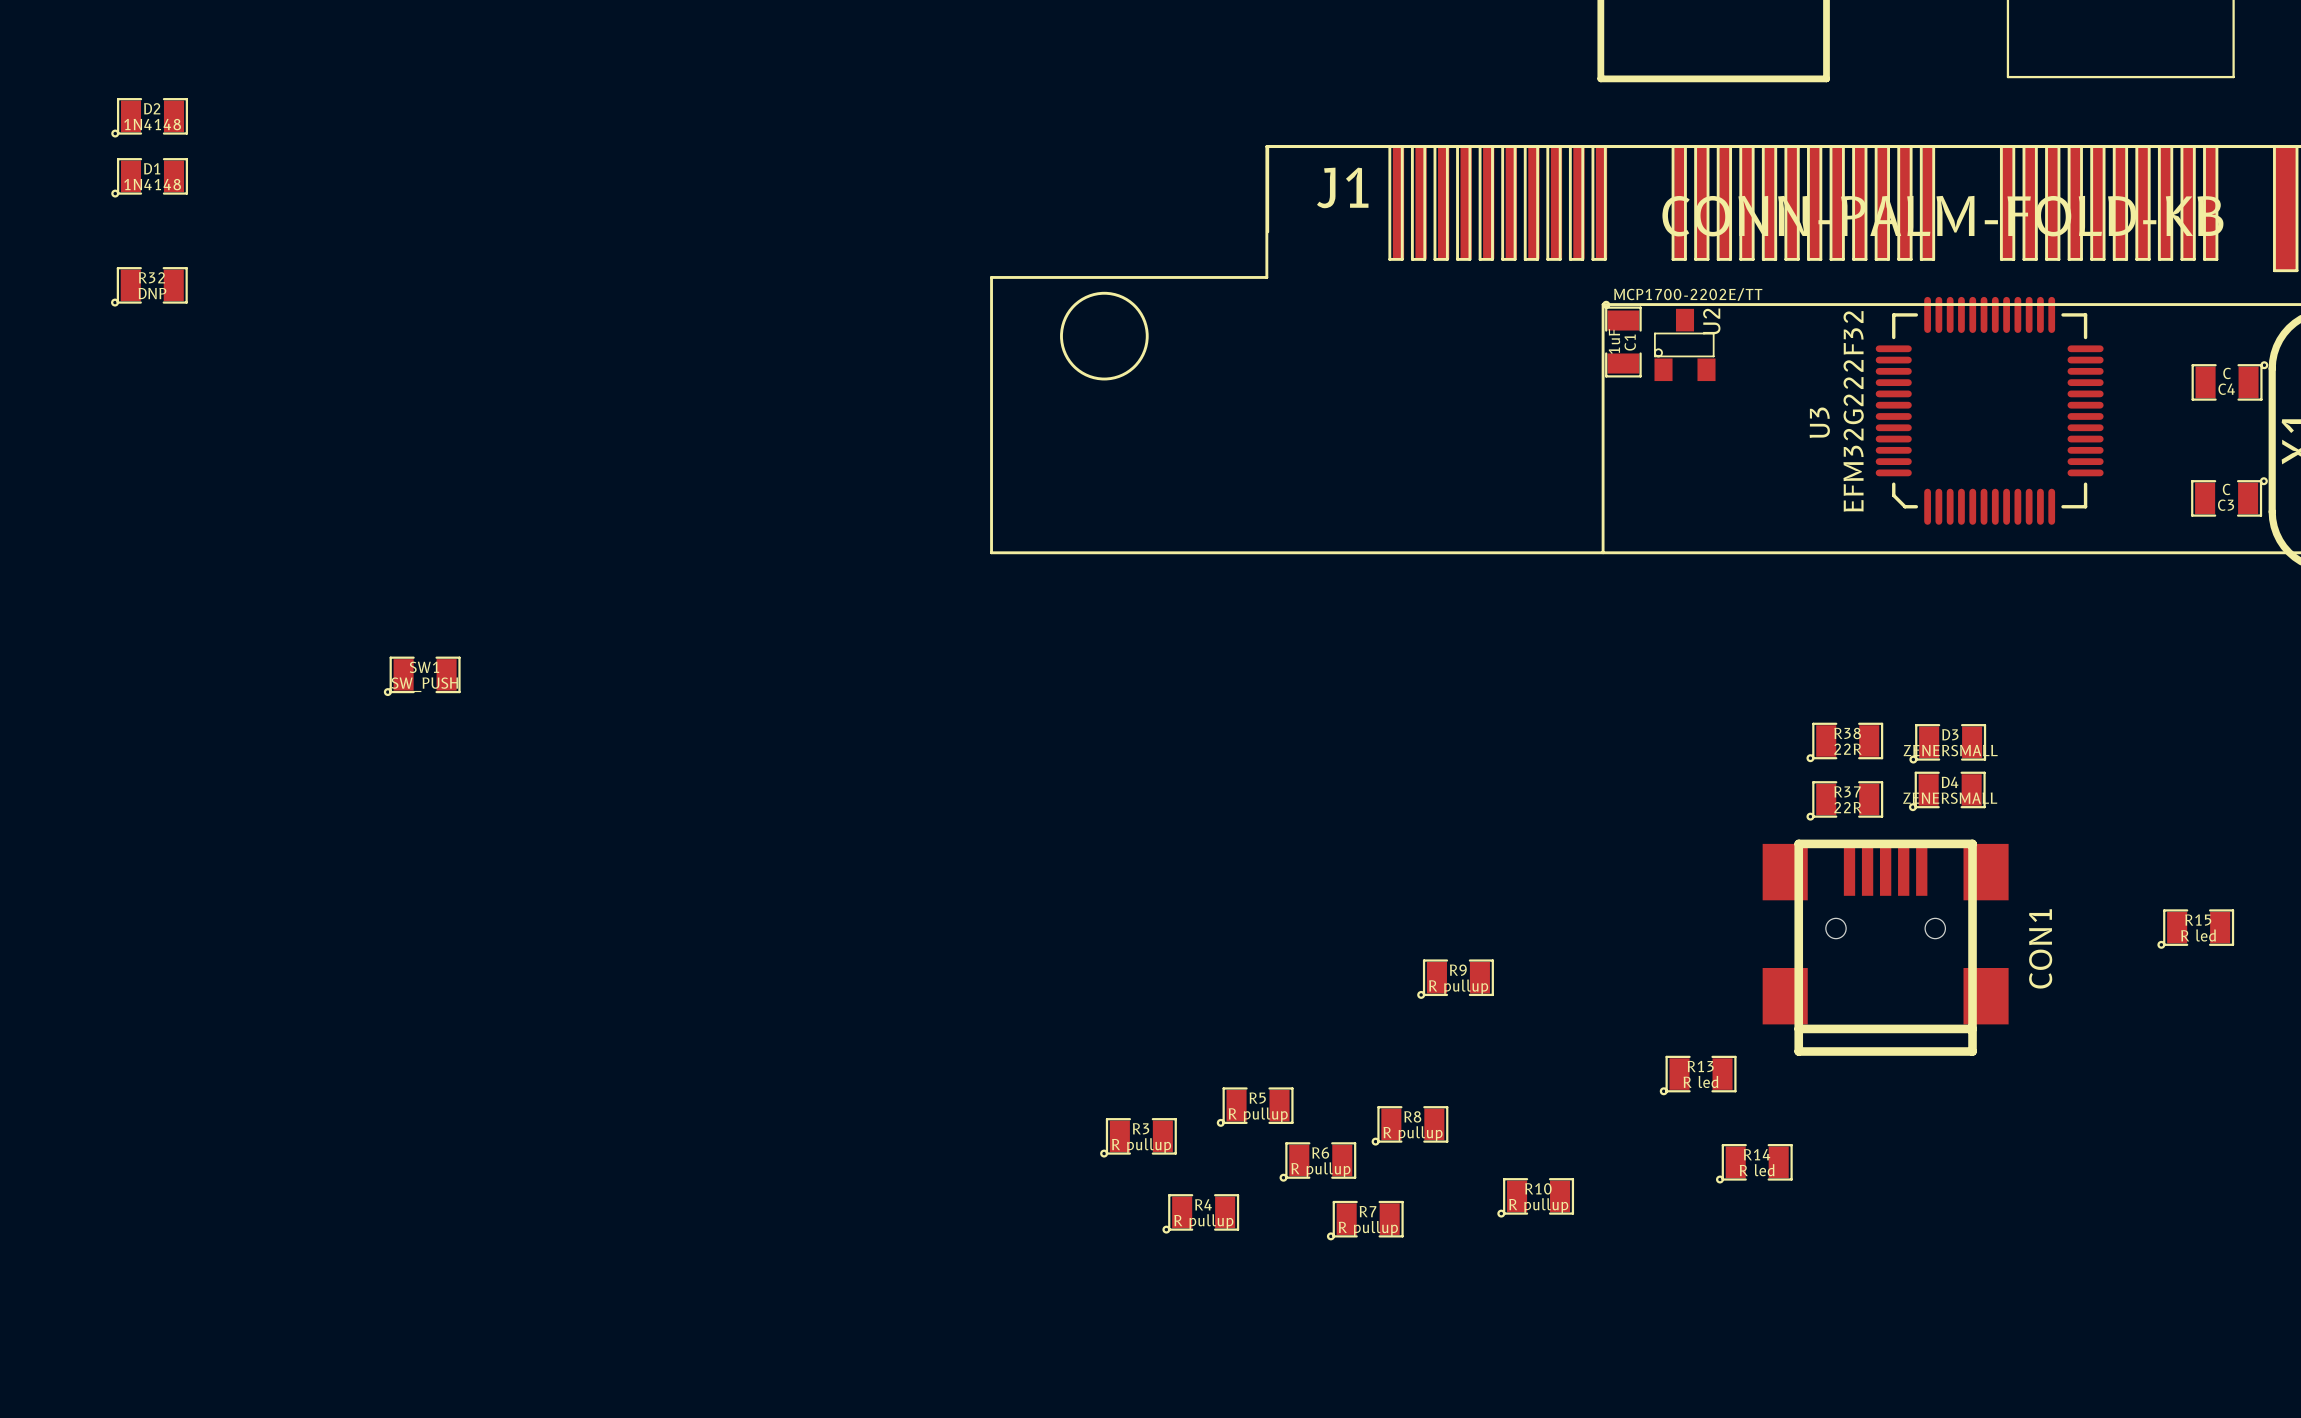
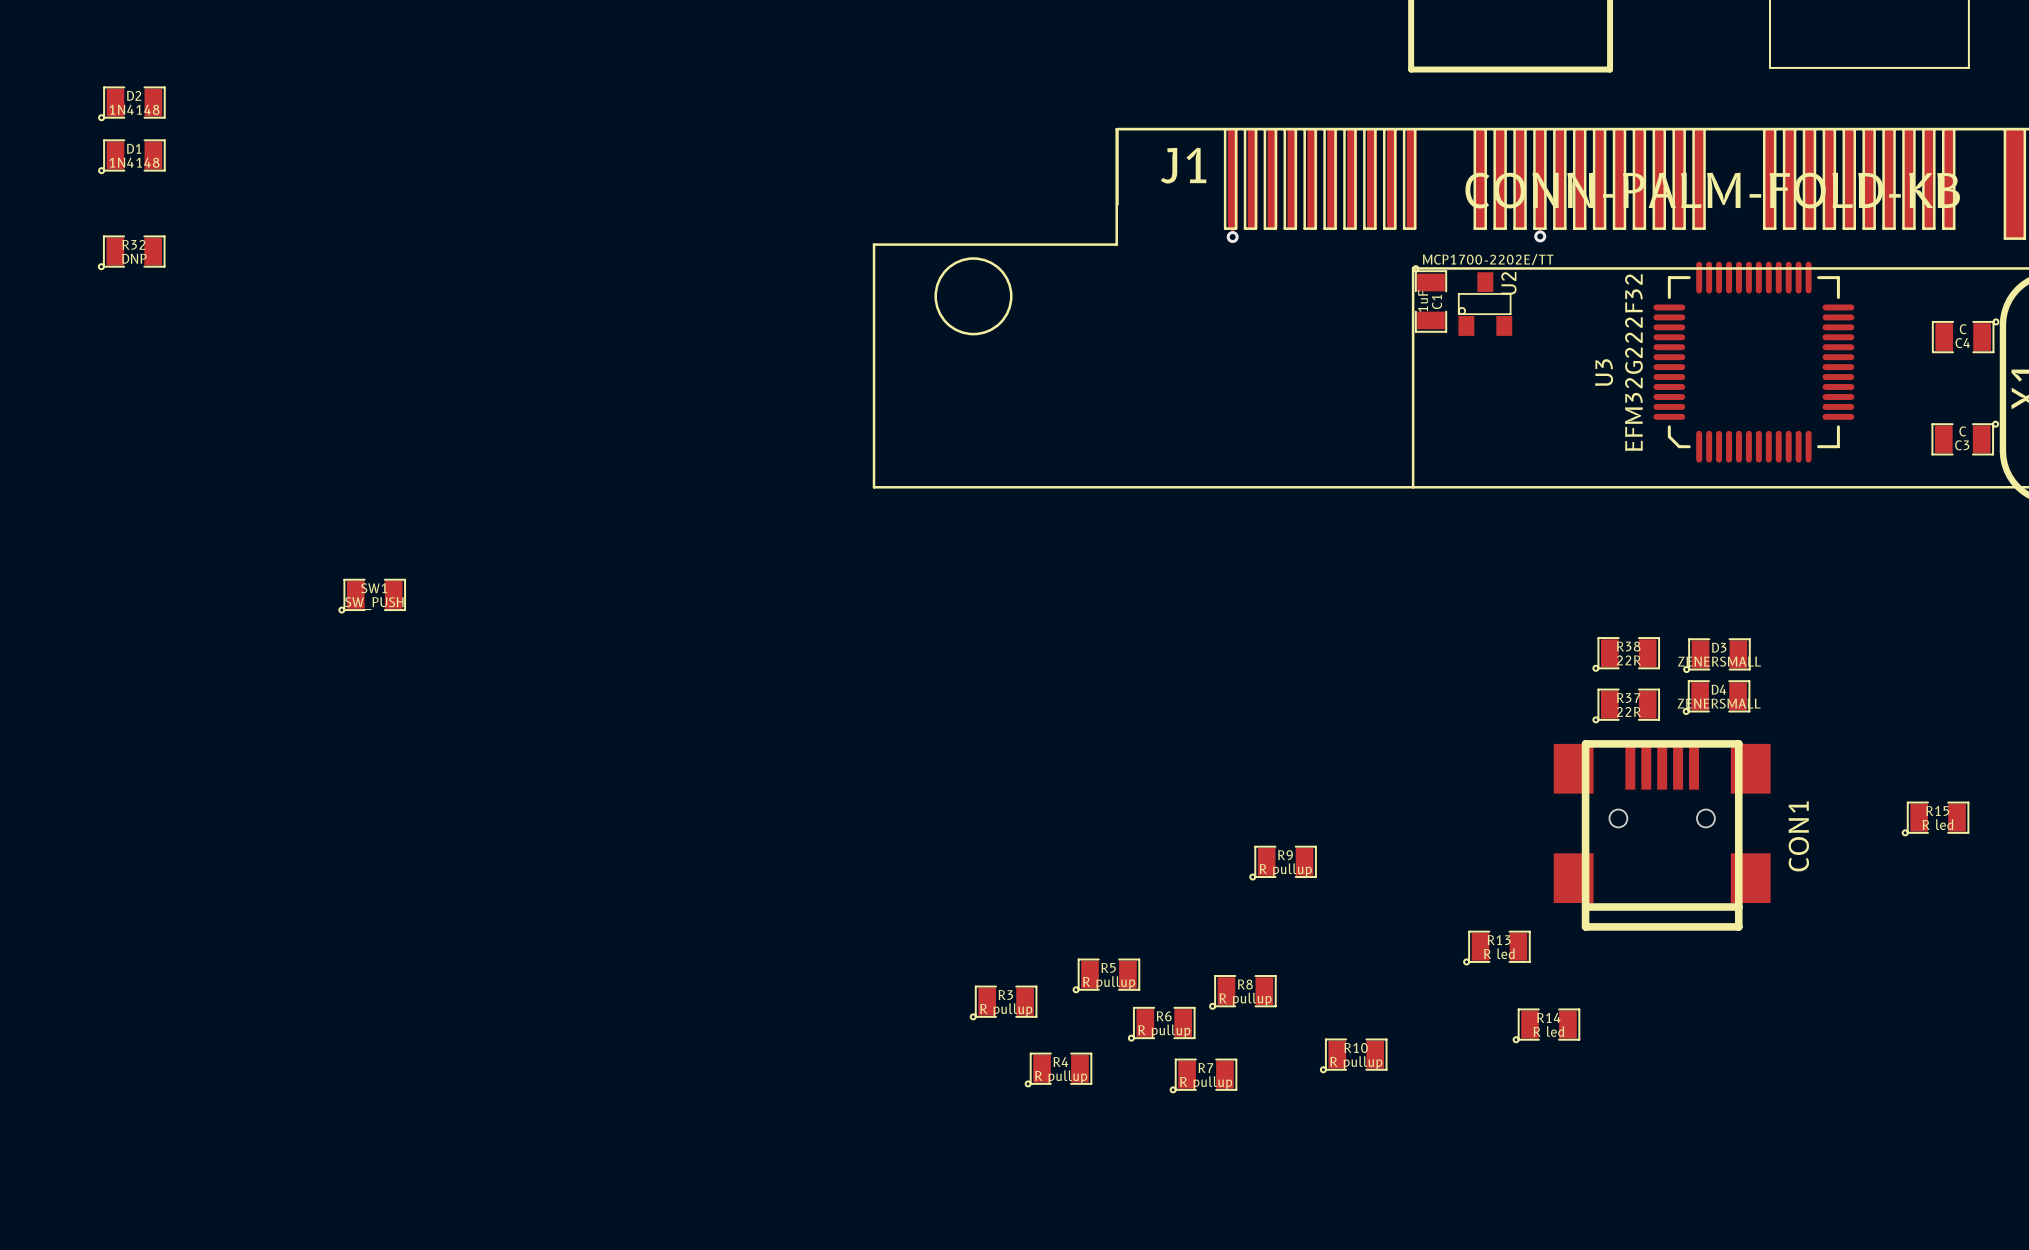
via: none -> (1232, 237)
via: none -> (1540, 236)

